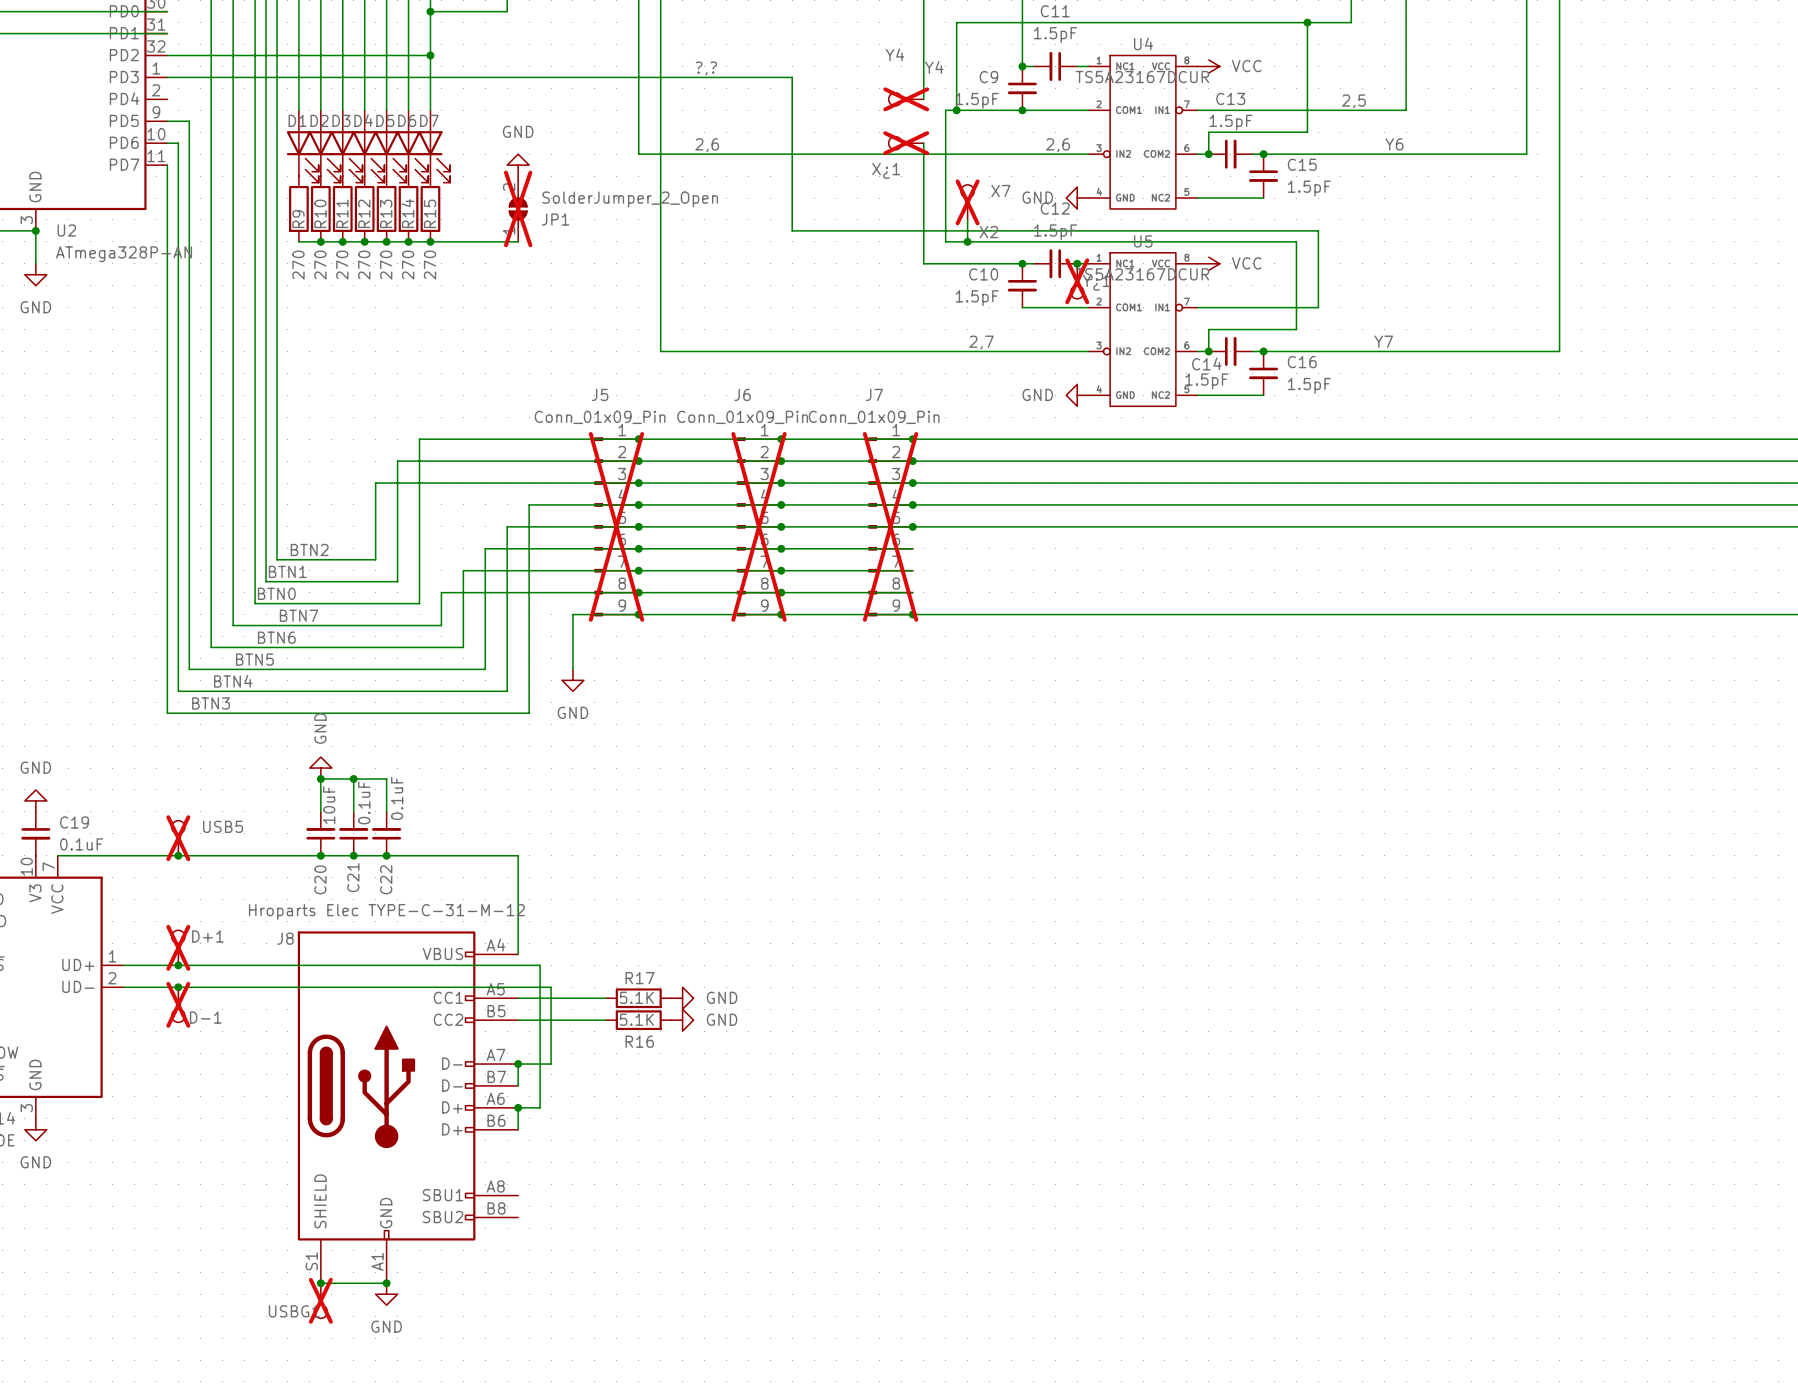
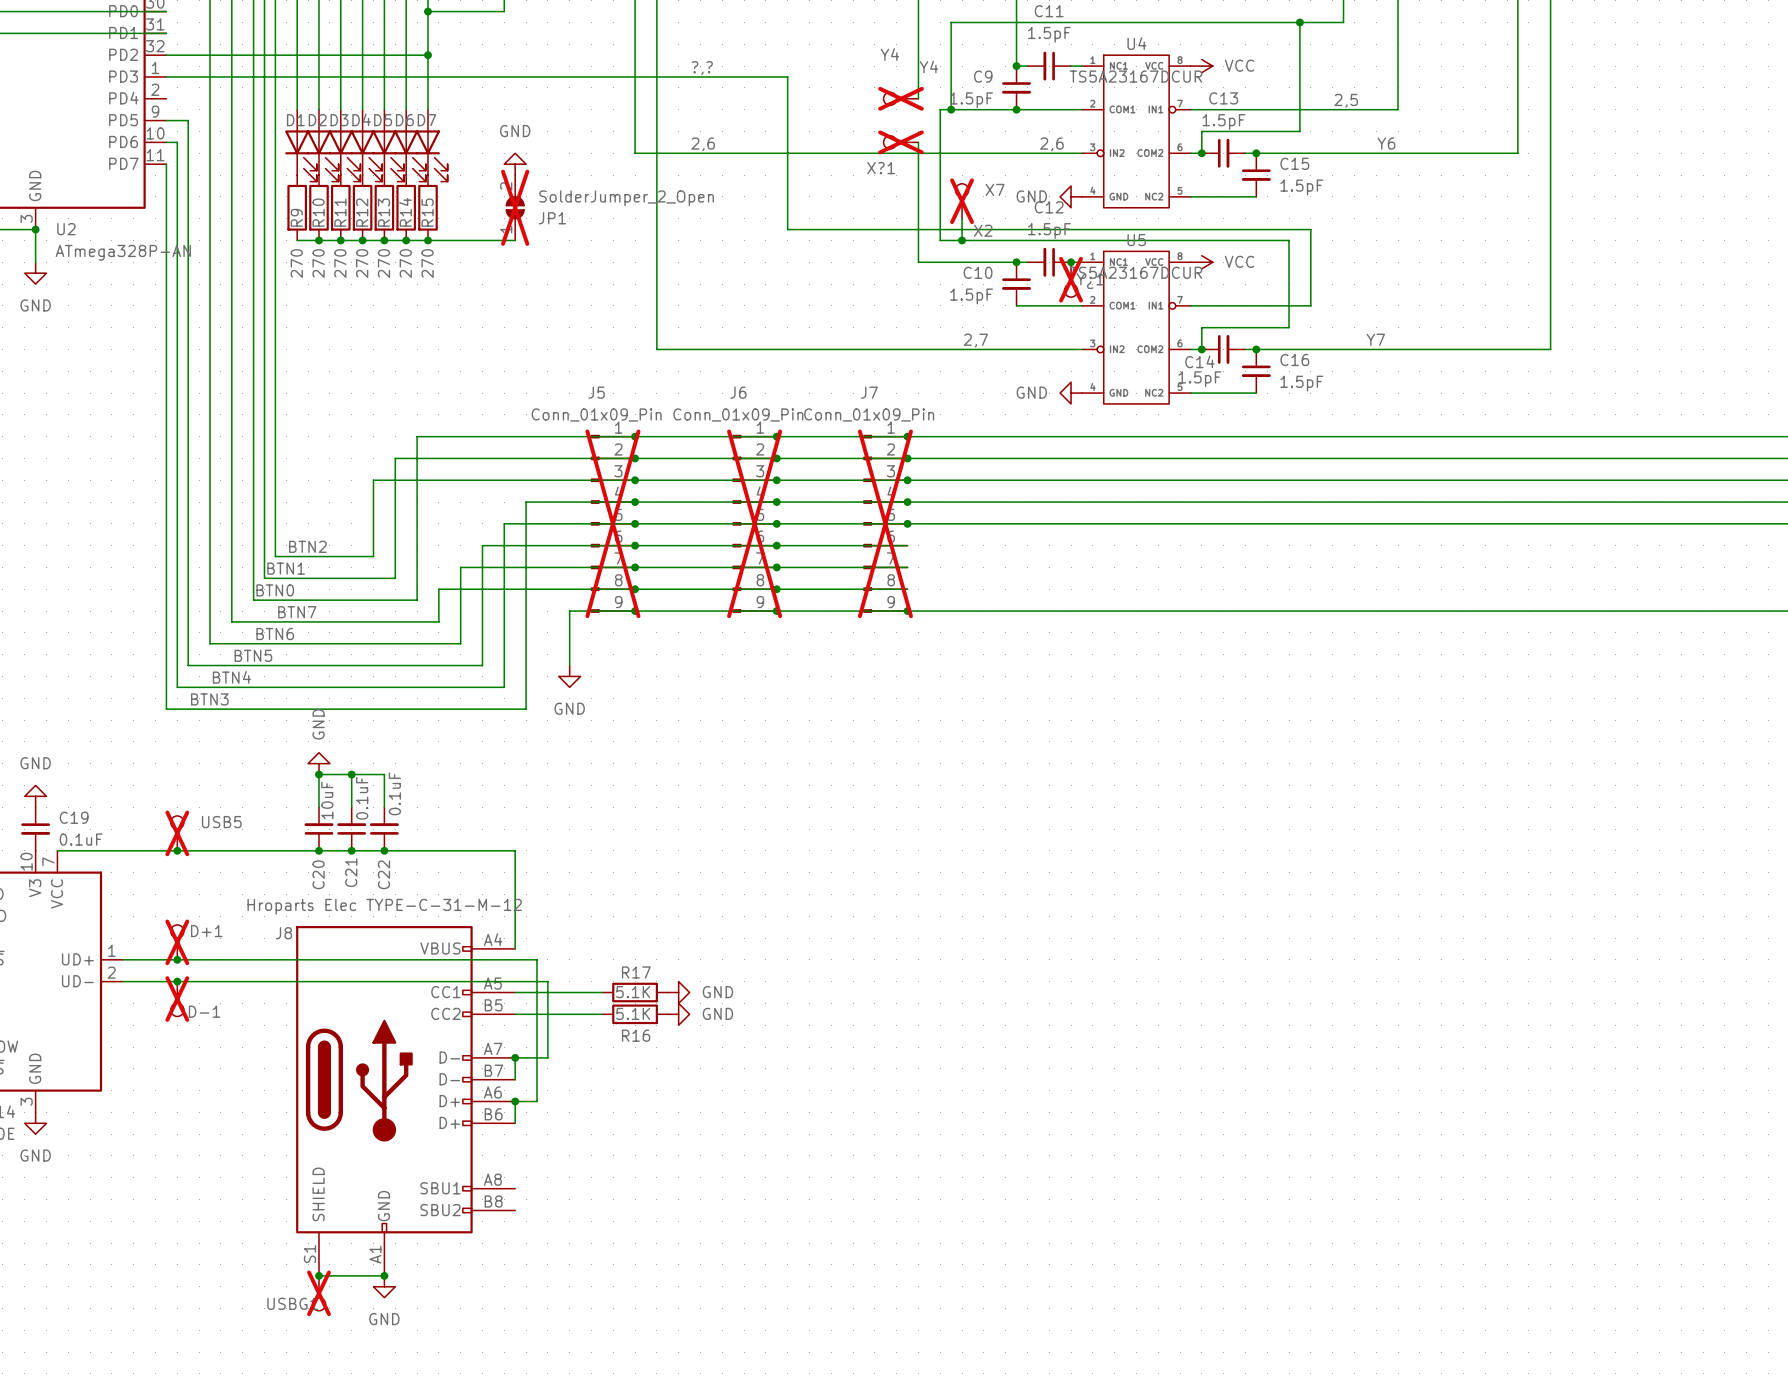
X¿1 name: X¿1 (886, 170) -> X?1 (881, 168)

